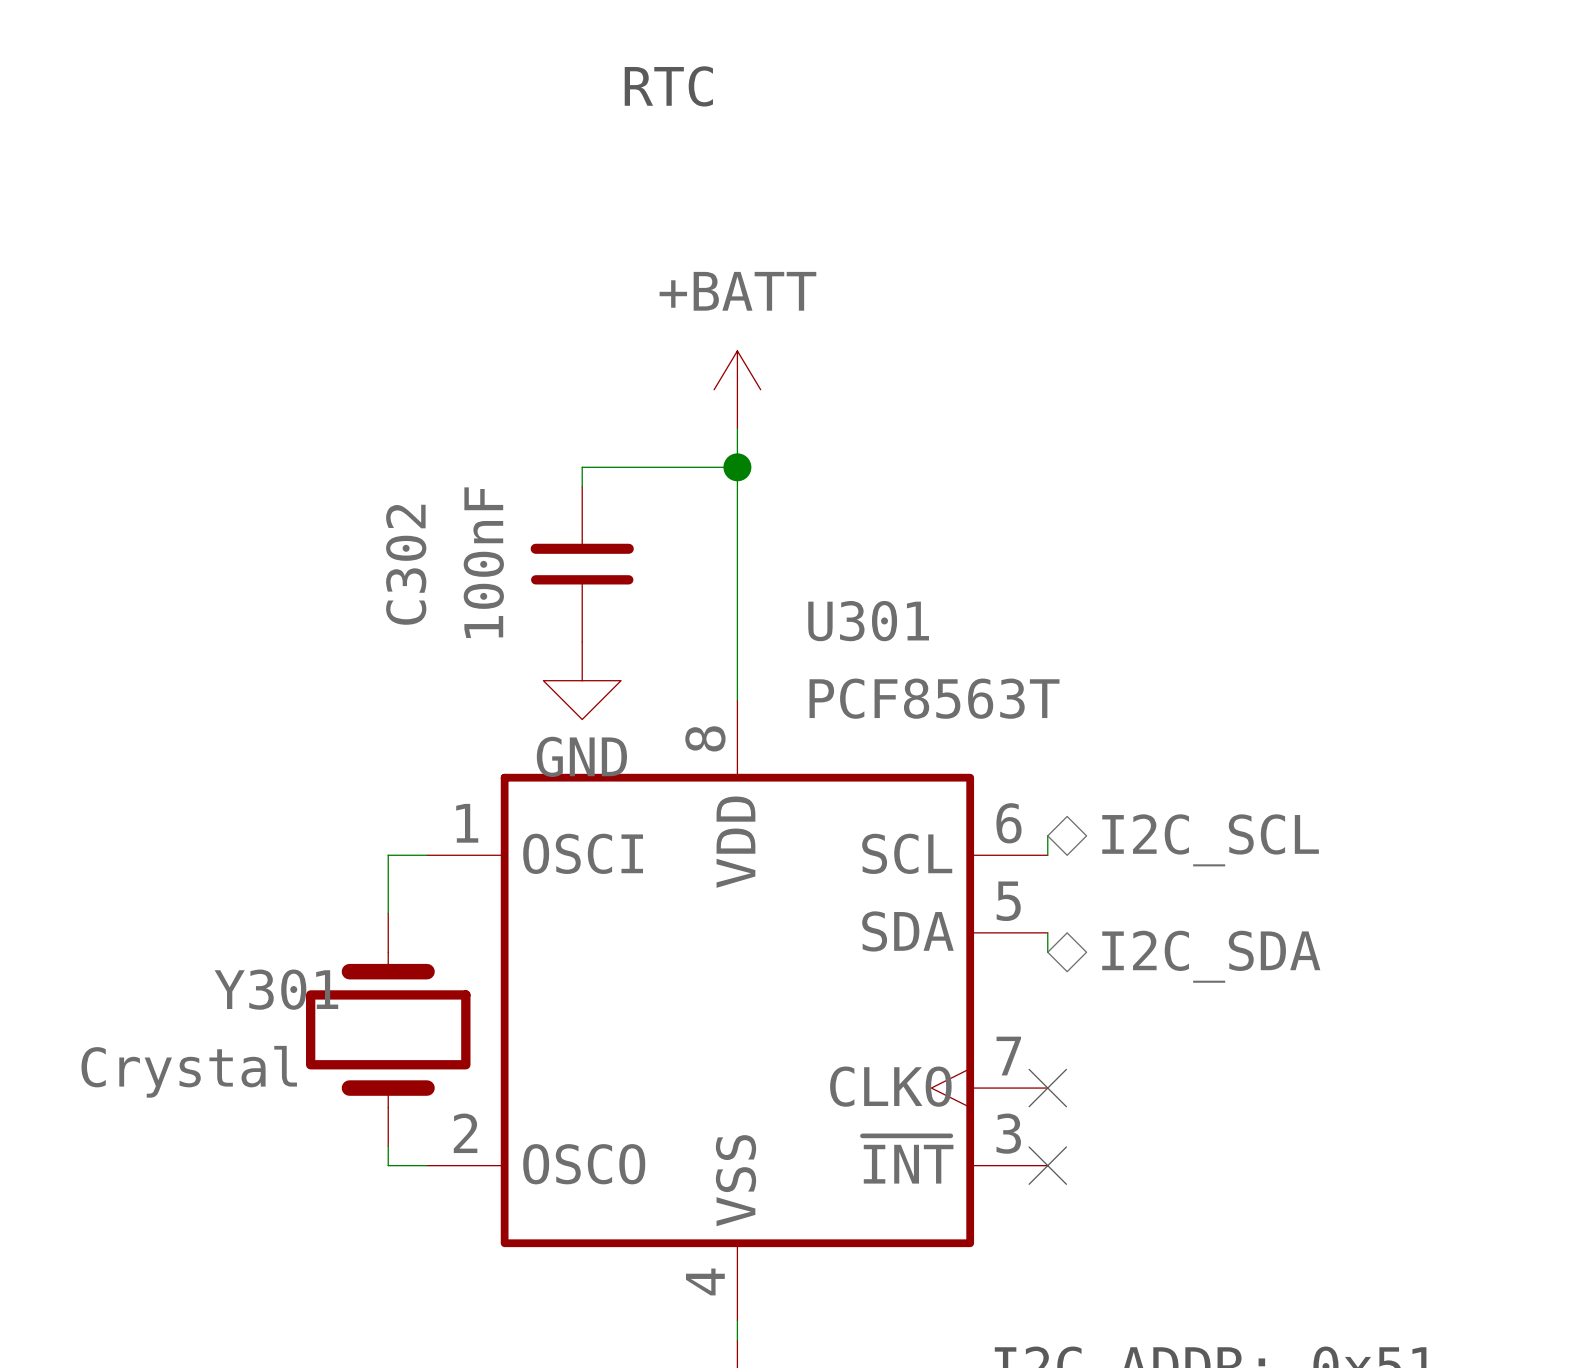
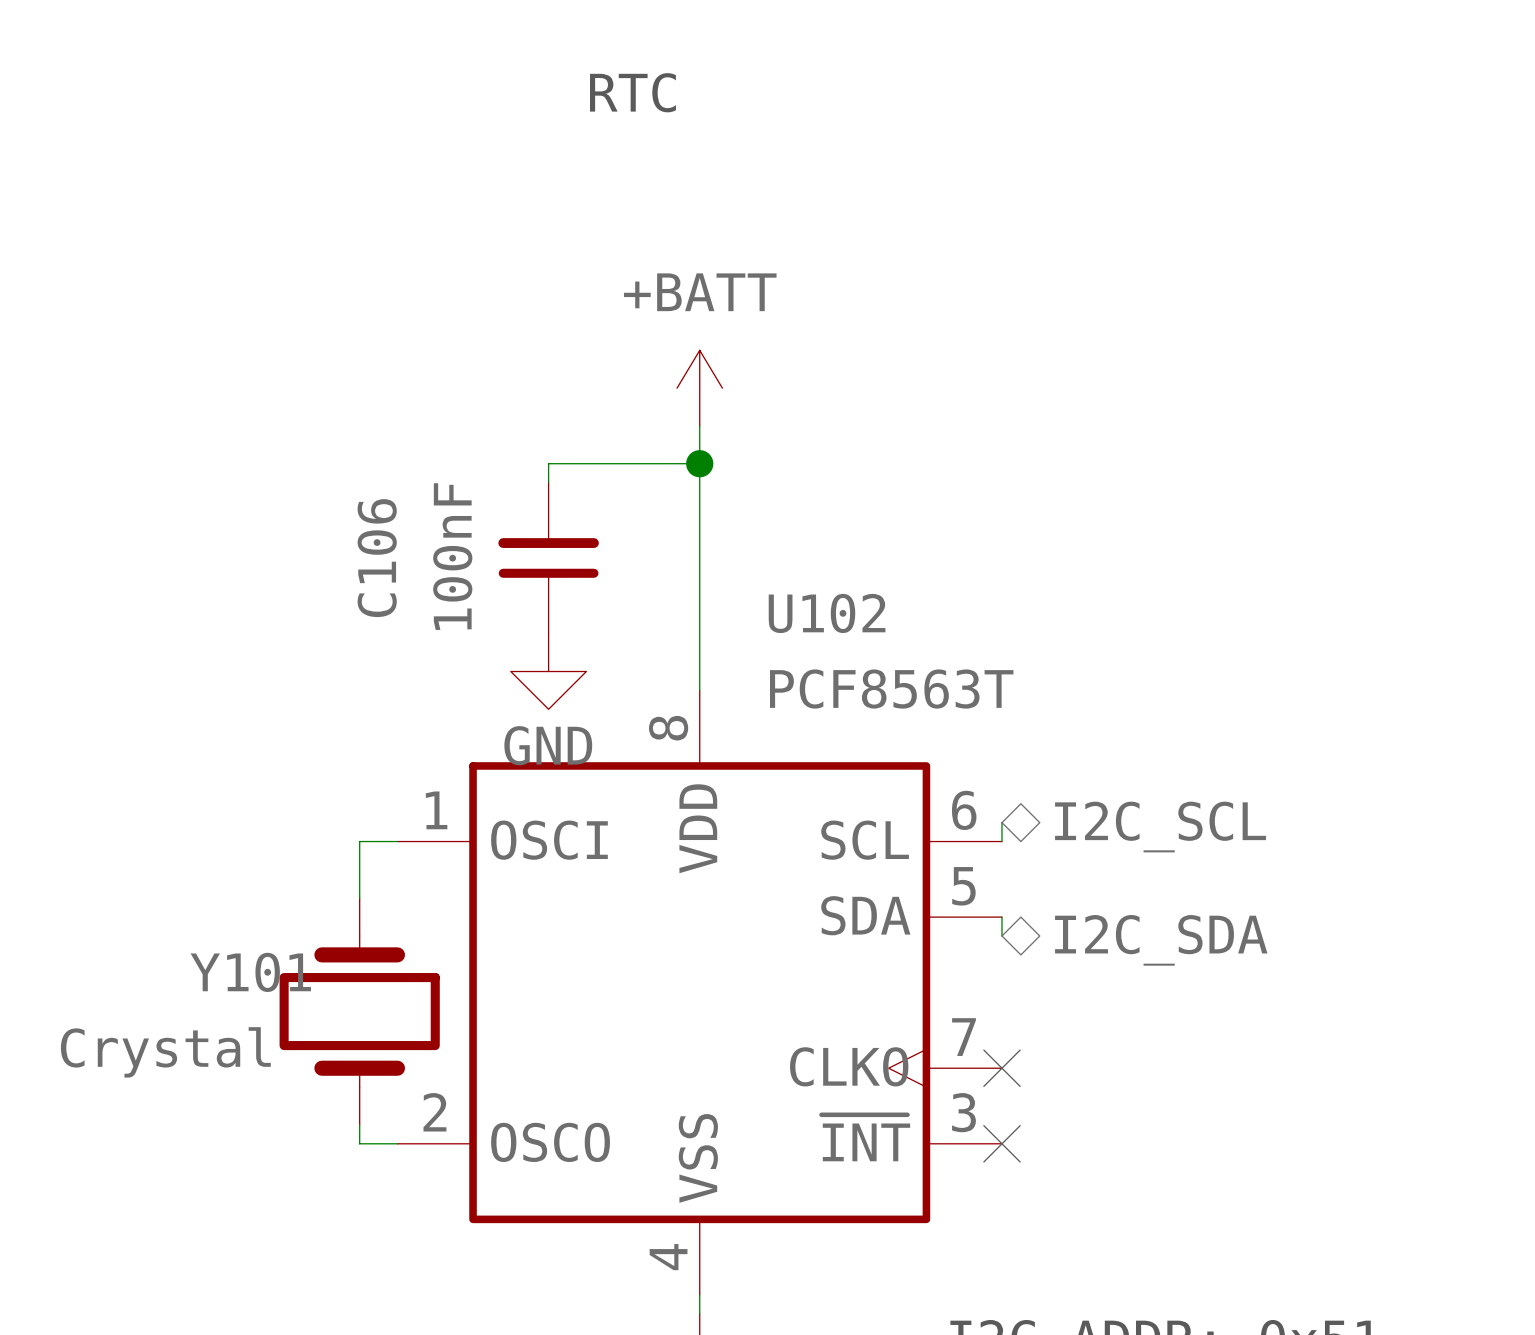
C302 name: C302 (406, 564) -> C106 (377, 558)
U301 name: U301 (868, 621) -> U102 (827, 613)
Y301 name: Y301 (276, 989) -> Y101 (250, 972)

